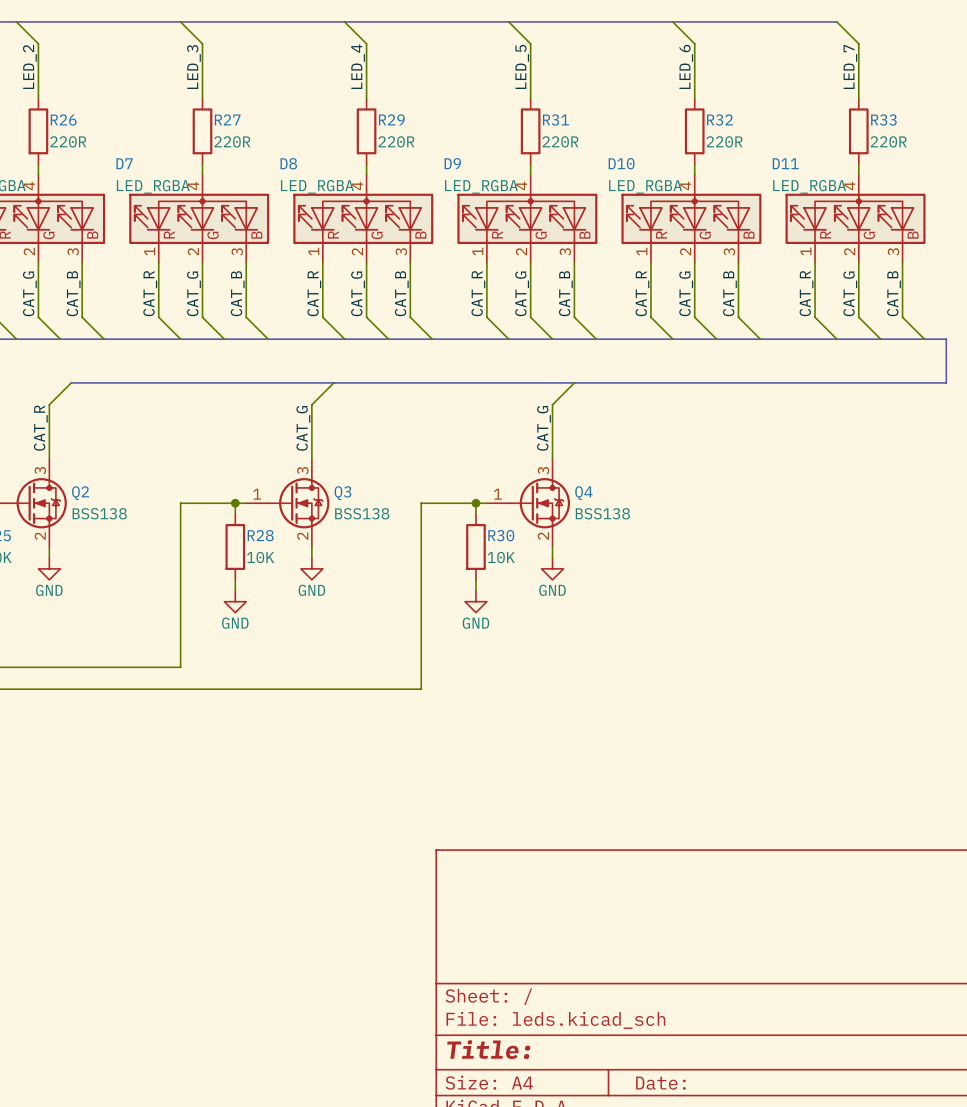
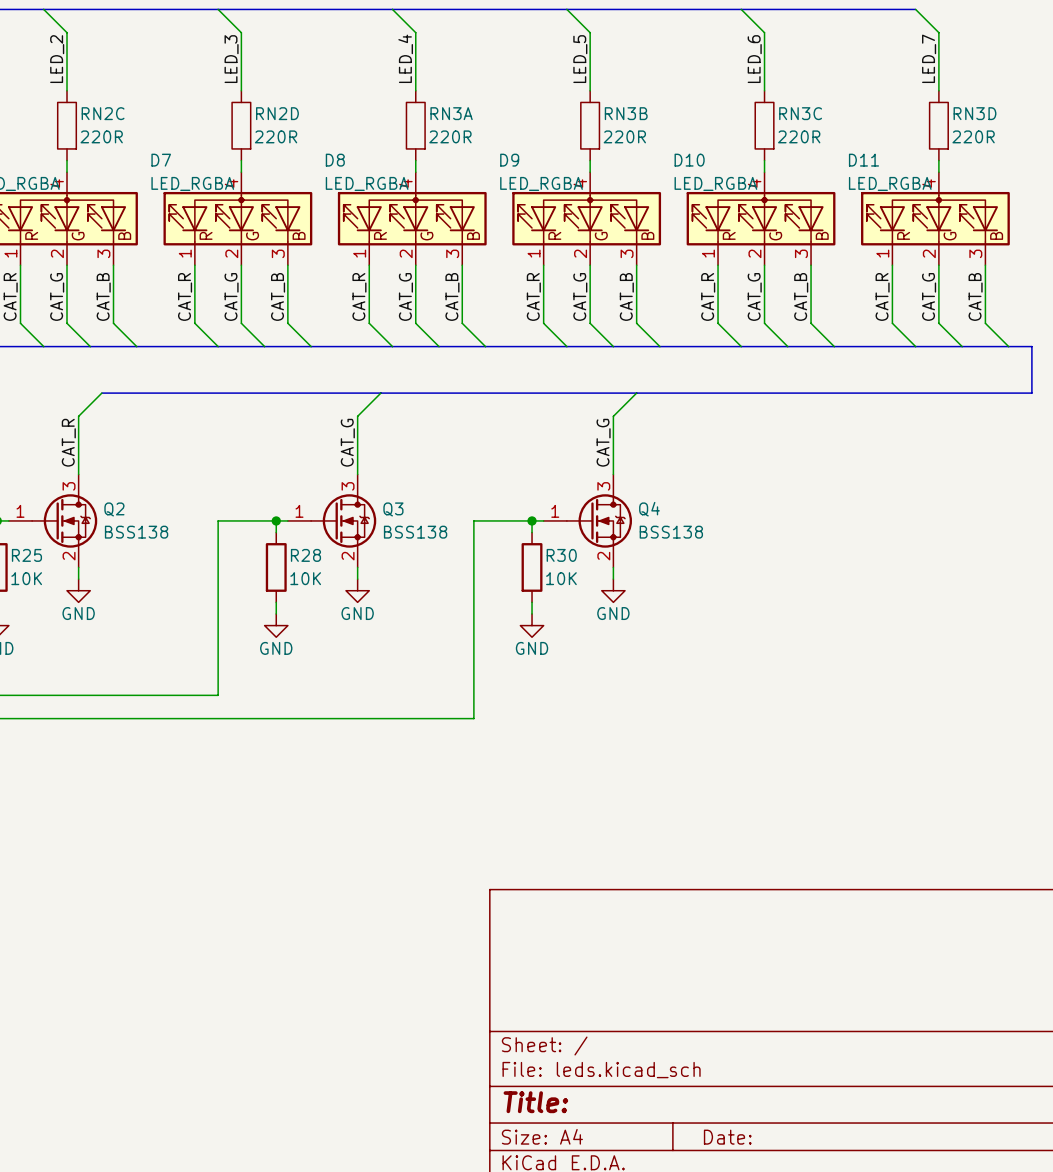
R26: 220R (38, 131) -> none
RN2C: none -> 220R (67, 125)
R27: 220R (202, 131) -> none
RN2D: none -> 220R (241, 125)
R29: 220R (366, 131) -> none
RN3A: none -> 220R (415, 125)
R31: 220R (530, 131) -> none
RN3B: none -> 220R (590, 125)
R32: 220R (694, 131) -> none
RN3C: none -> 220R (764, 125)
R33: 220R (858, 131) -> none
RN3D: none -> 220R (938, 125)

